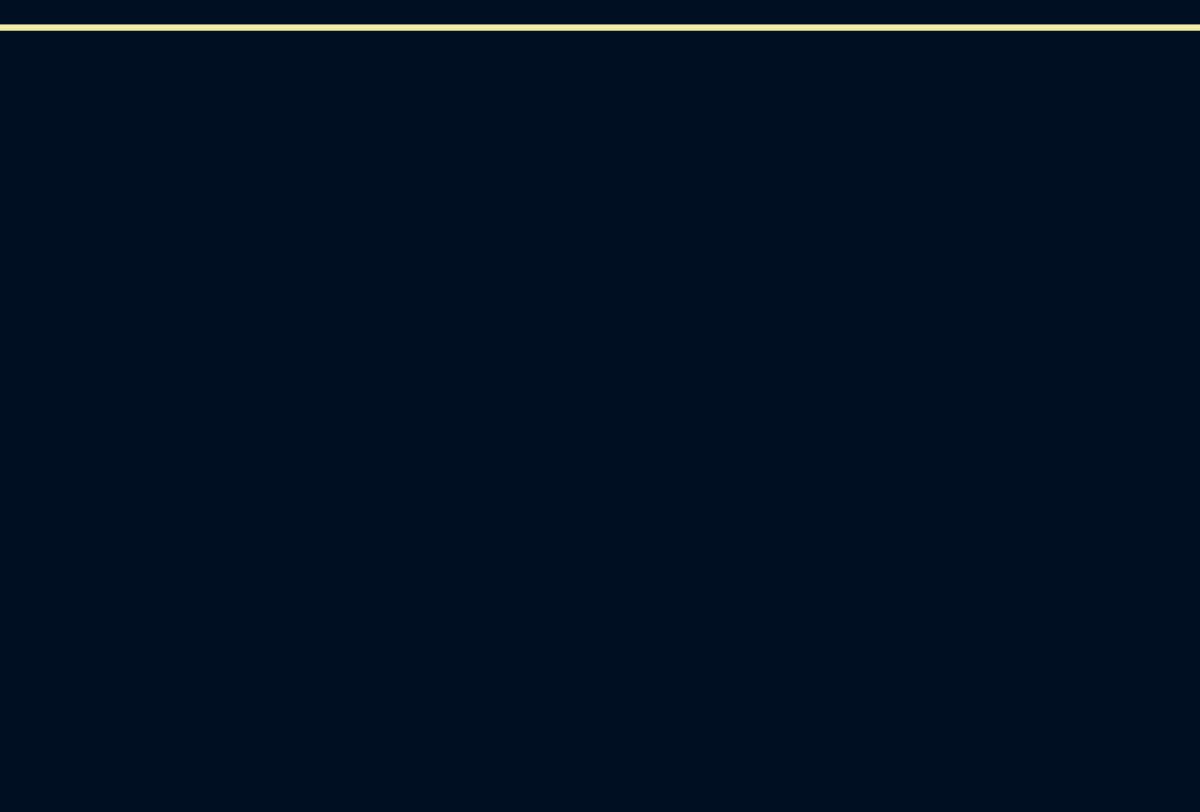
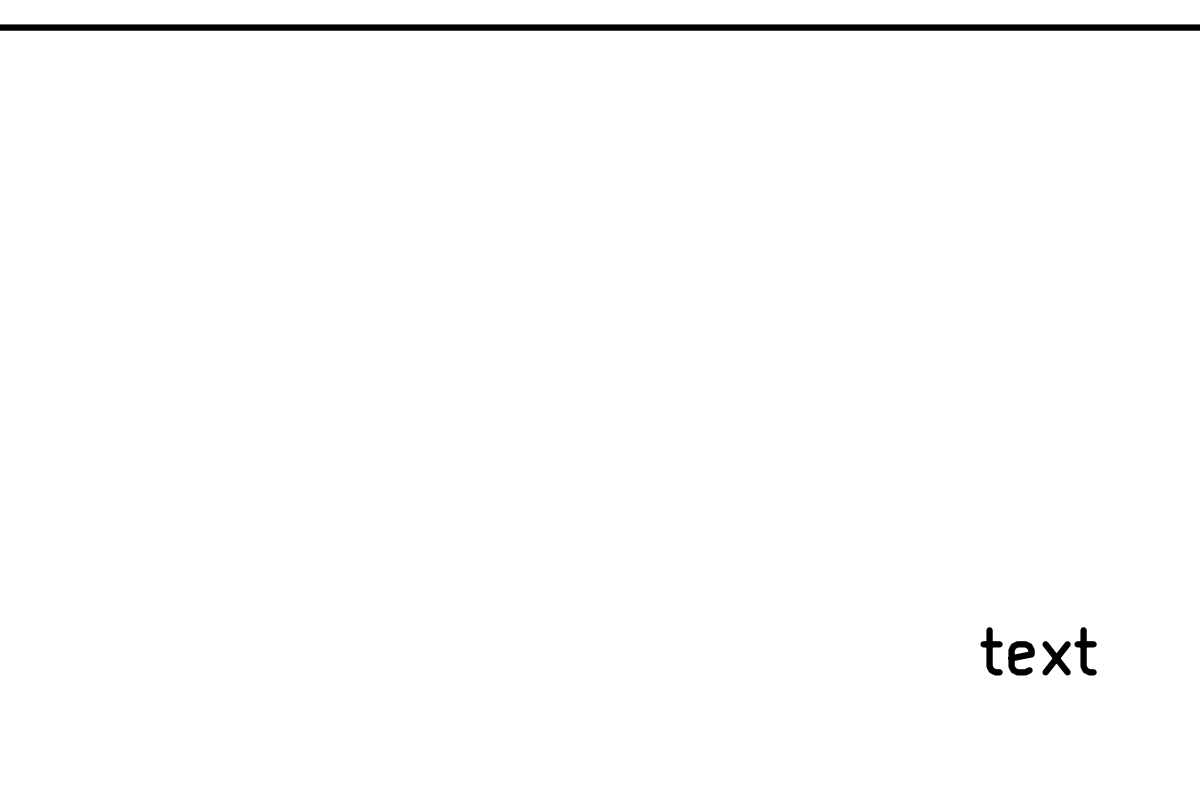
part text: none -> text (1038, 651)

